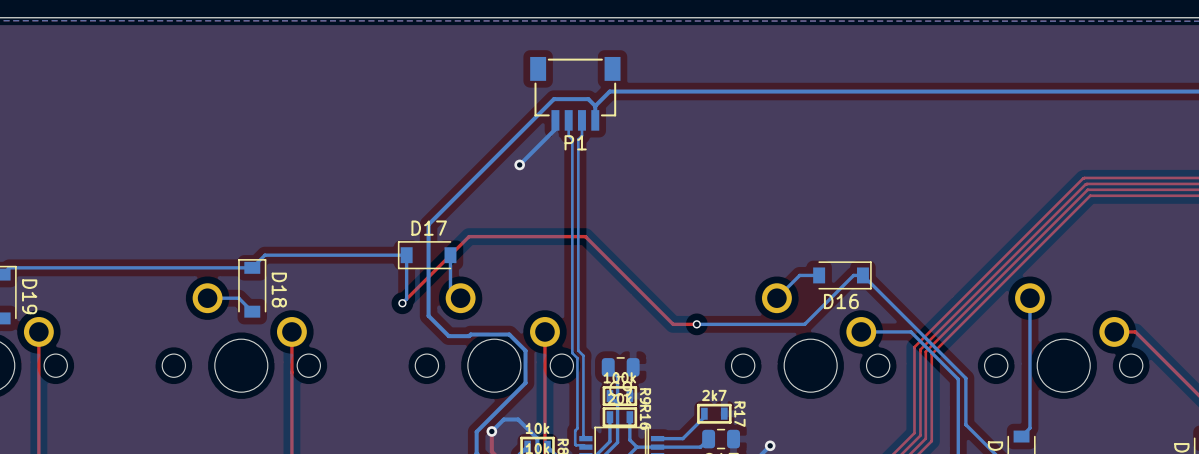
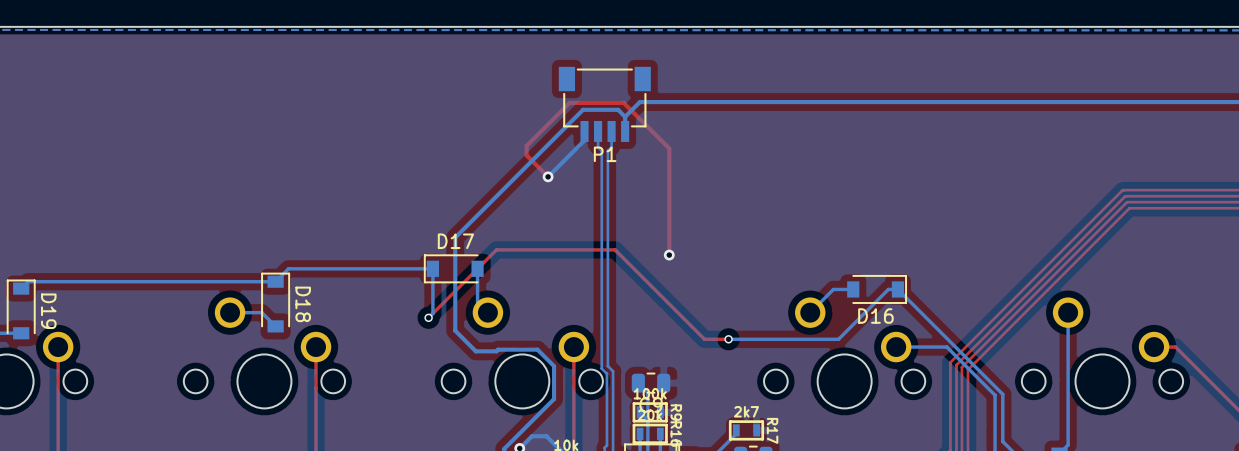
top track: none -> (548, 176) (526, 155) (526, 145) (569, 102) (623, 102) (669, 148) (669, 255)
via: none -> (669, 255)

